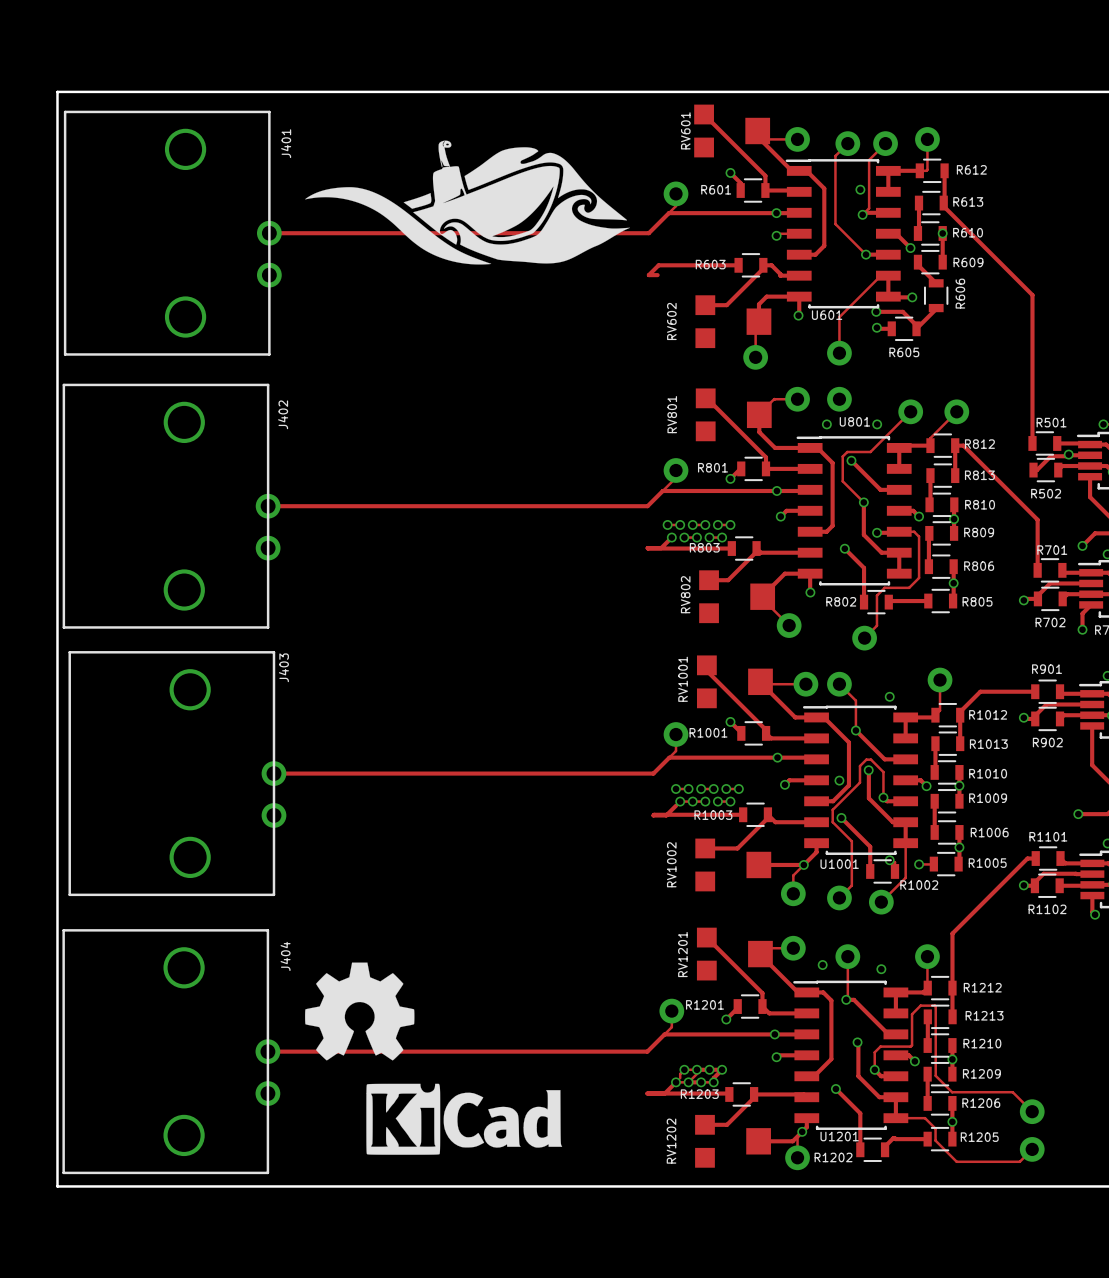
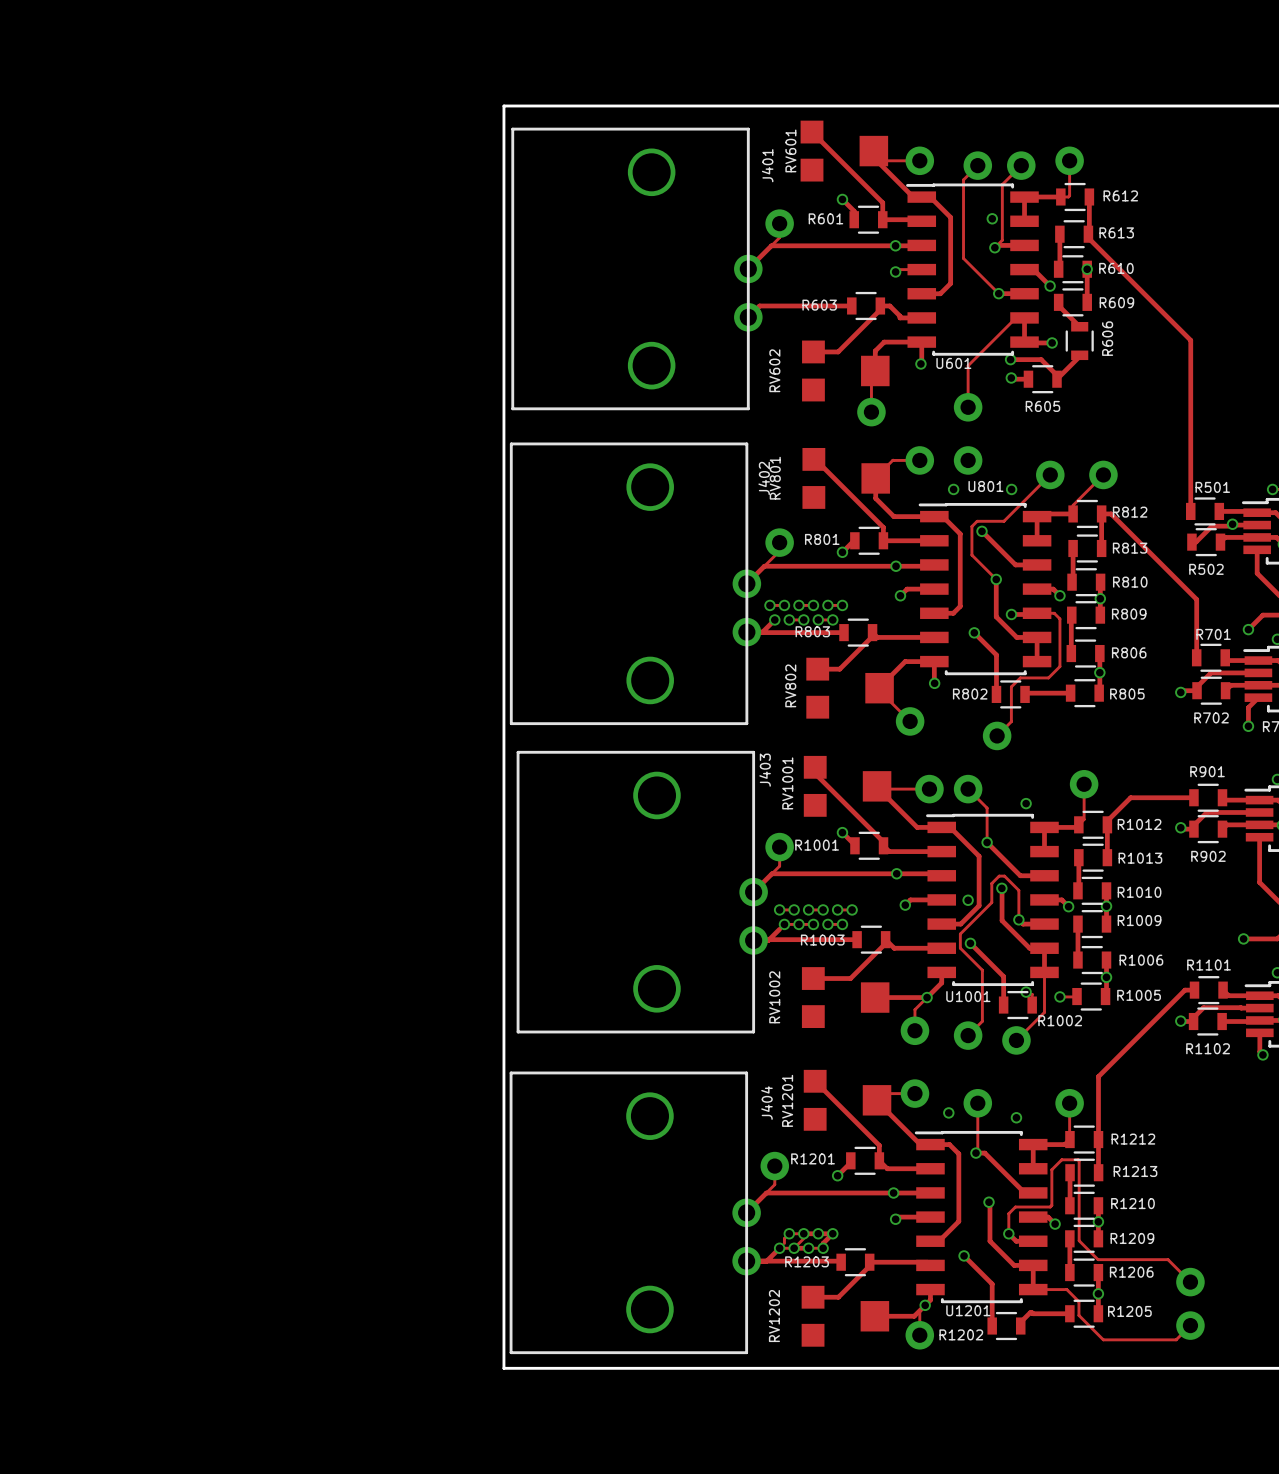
board edge: (436, 91) (57, 91) (57, 1186) (436, 1186) -> (503, 105) (503, 1368)
drawing: [305, 140, 630, 265] -> none
J401 position: (172, 233) -> (636, 268)
track: (269, 233) (648, 233) -> none
J402 position: (171, 506) -> (635, 583)
track: (268, 506) (647, 506) -> none
J403 position: (177, 773) -> (642, 892)
track: (273, 773) (653, 773) -> none
drawing: [305, 962, 415, 1061] -> none
J404 position: (171, 1051) -> (635, 1212)
track: (267, 1051) (647, 1051) -> none
drawing: [366, 1083, 563, 1155] -> none

